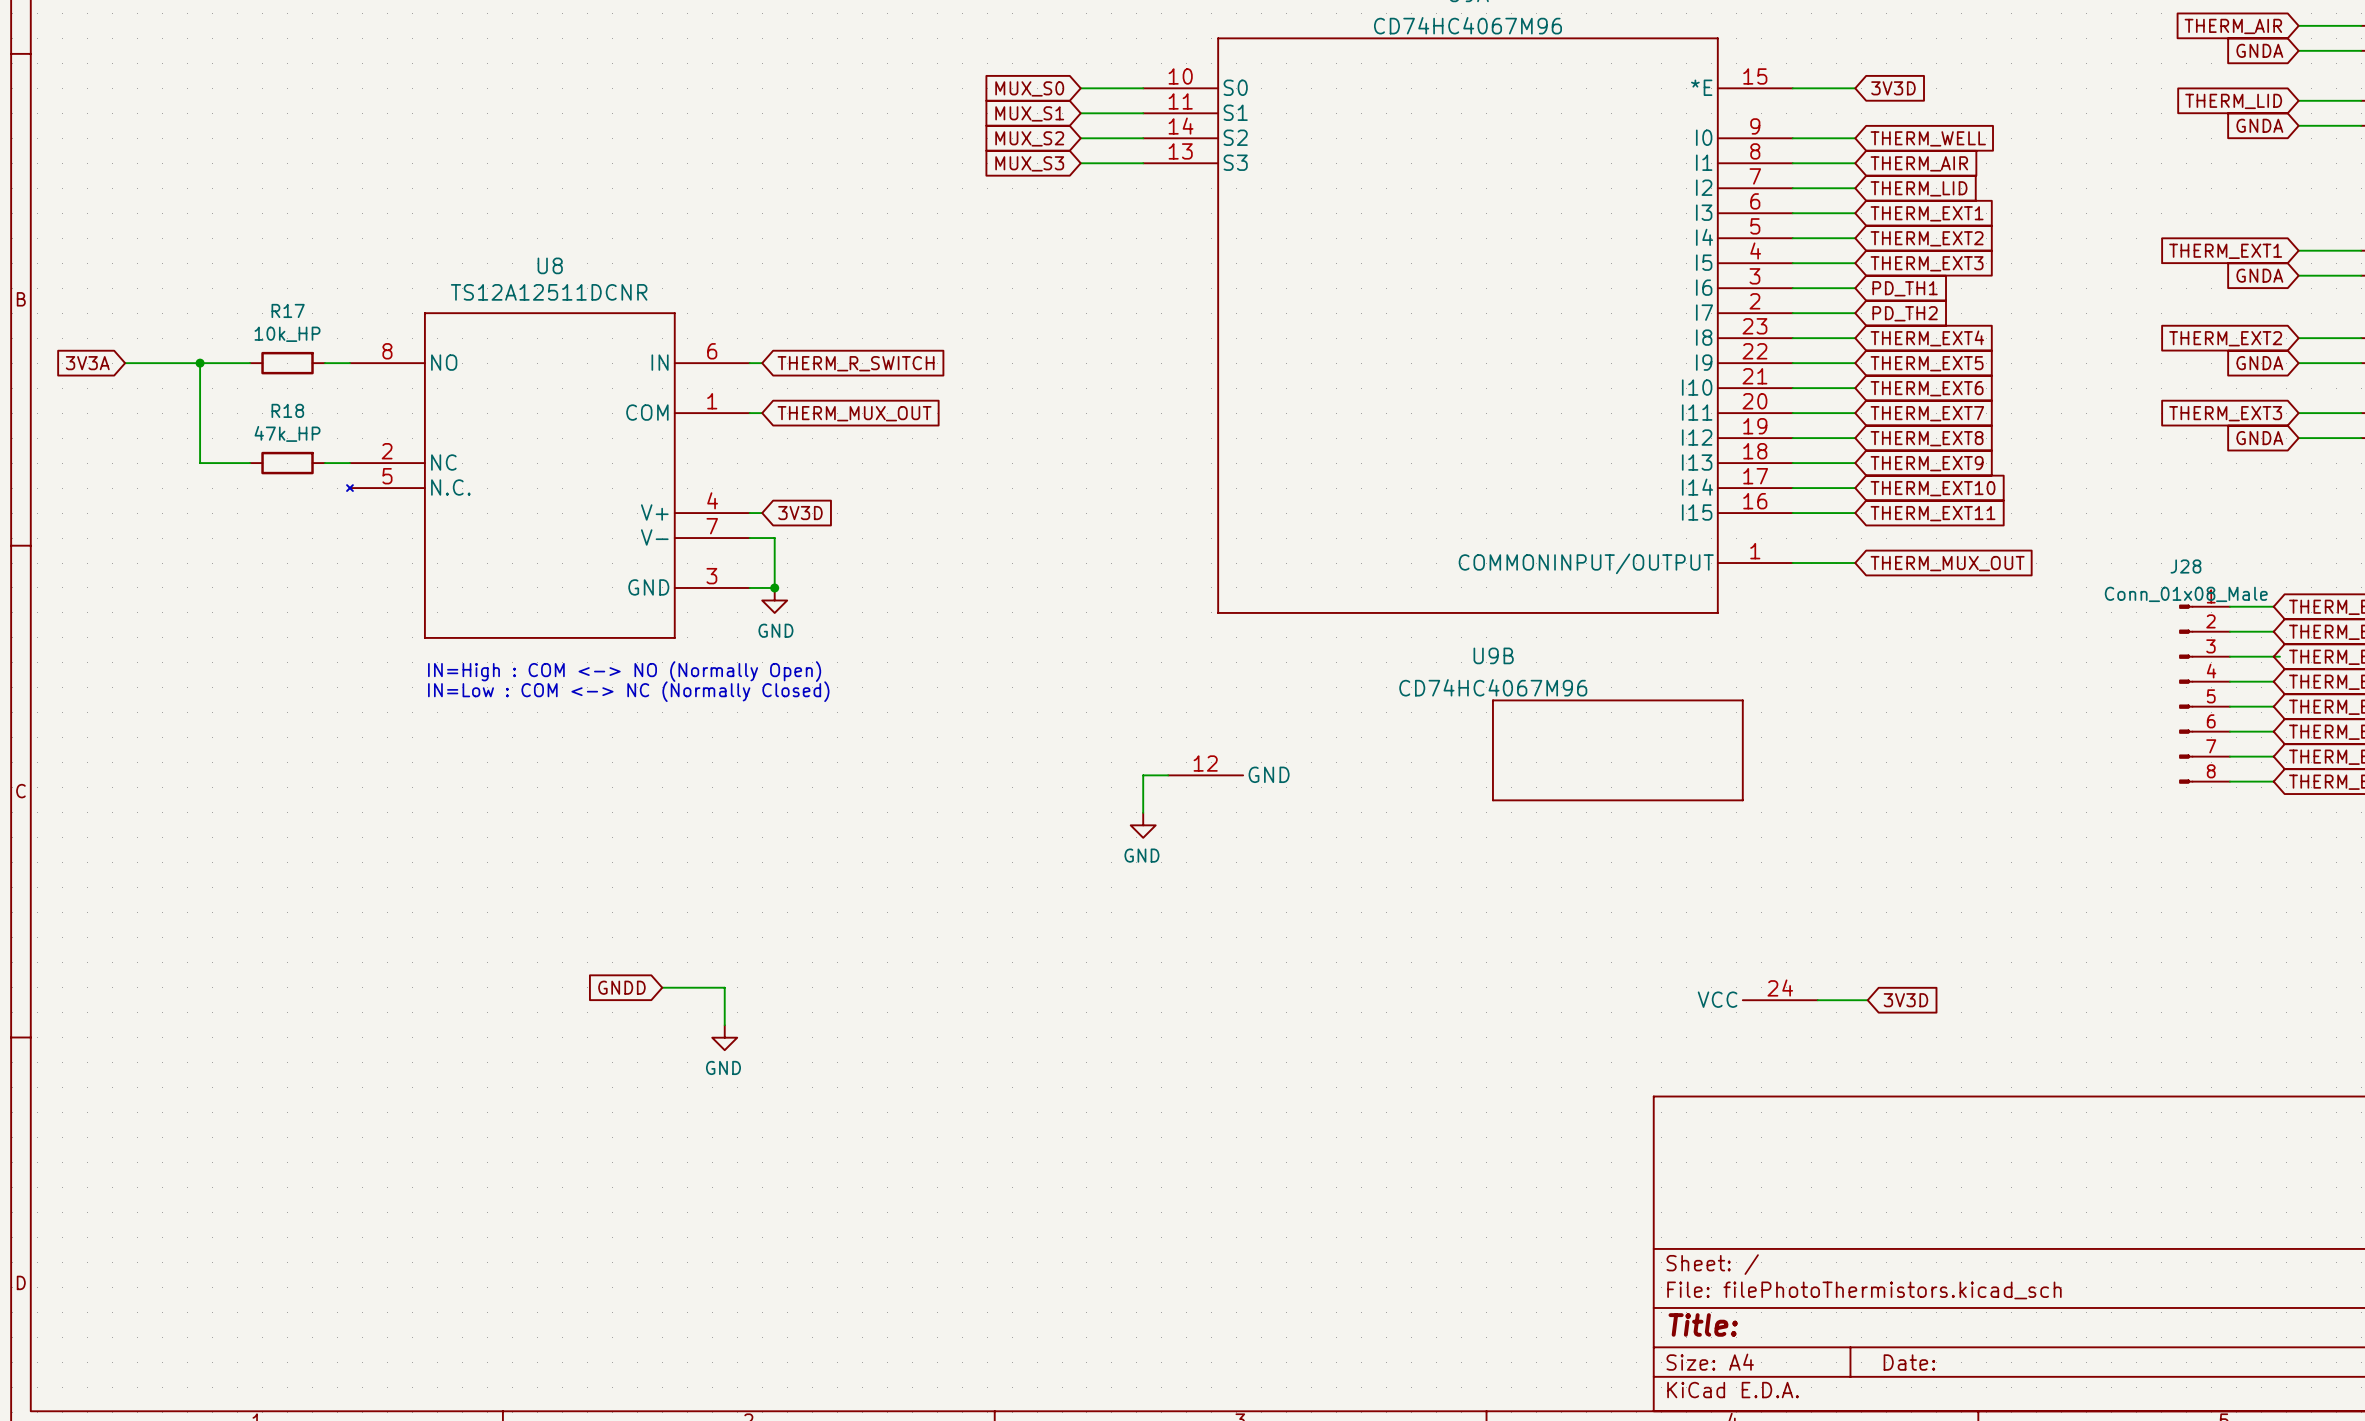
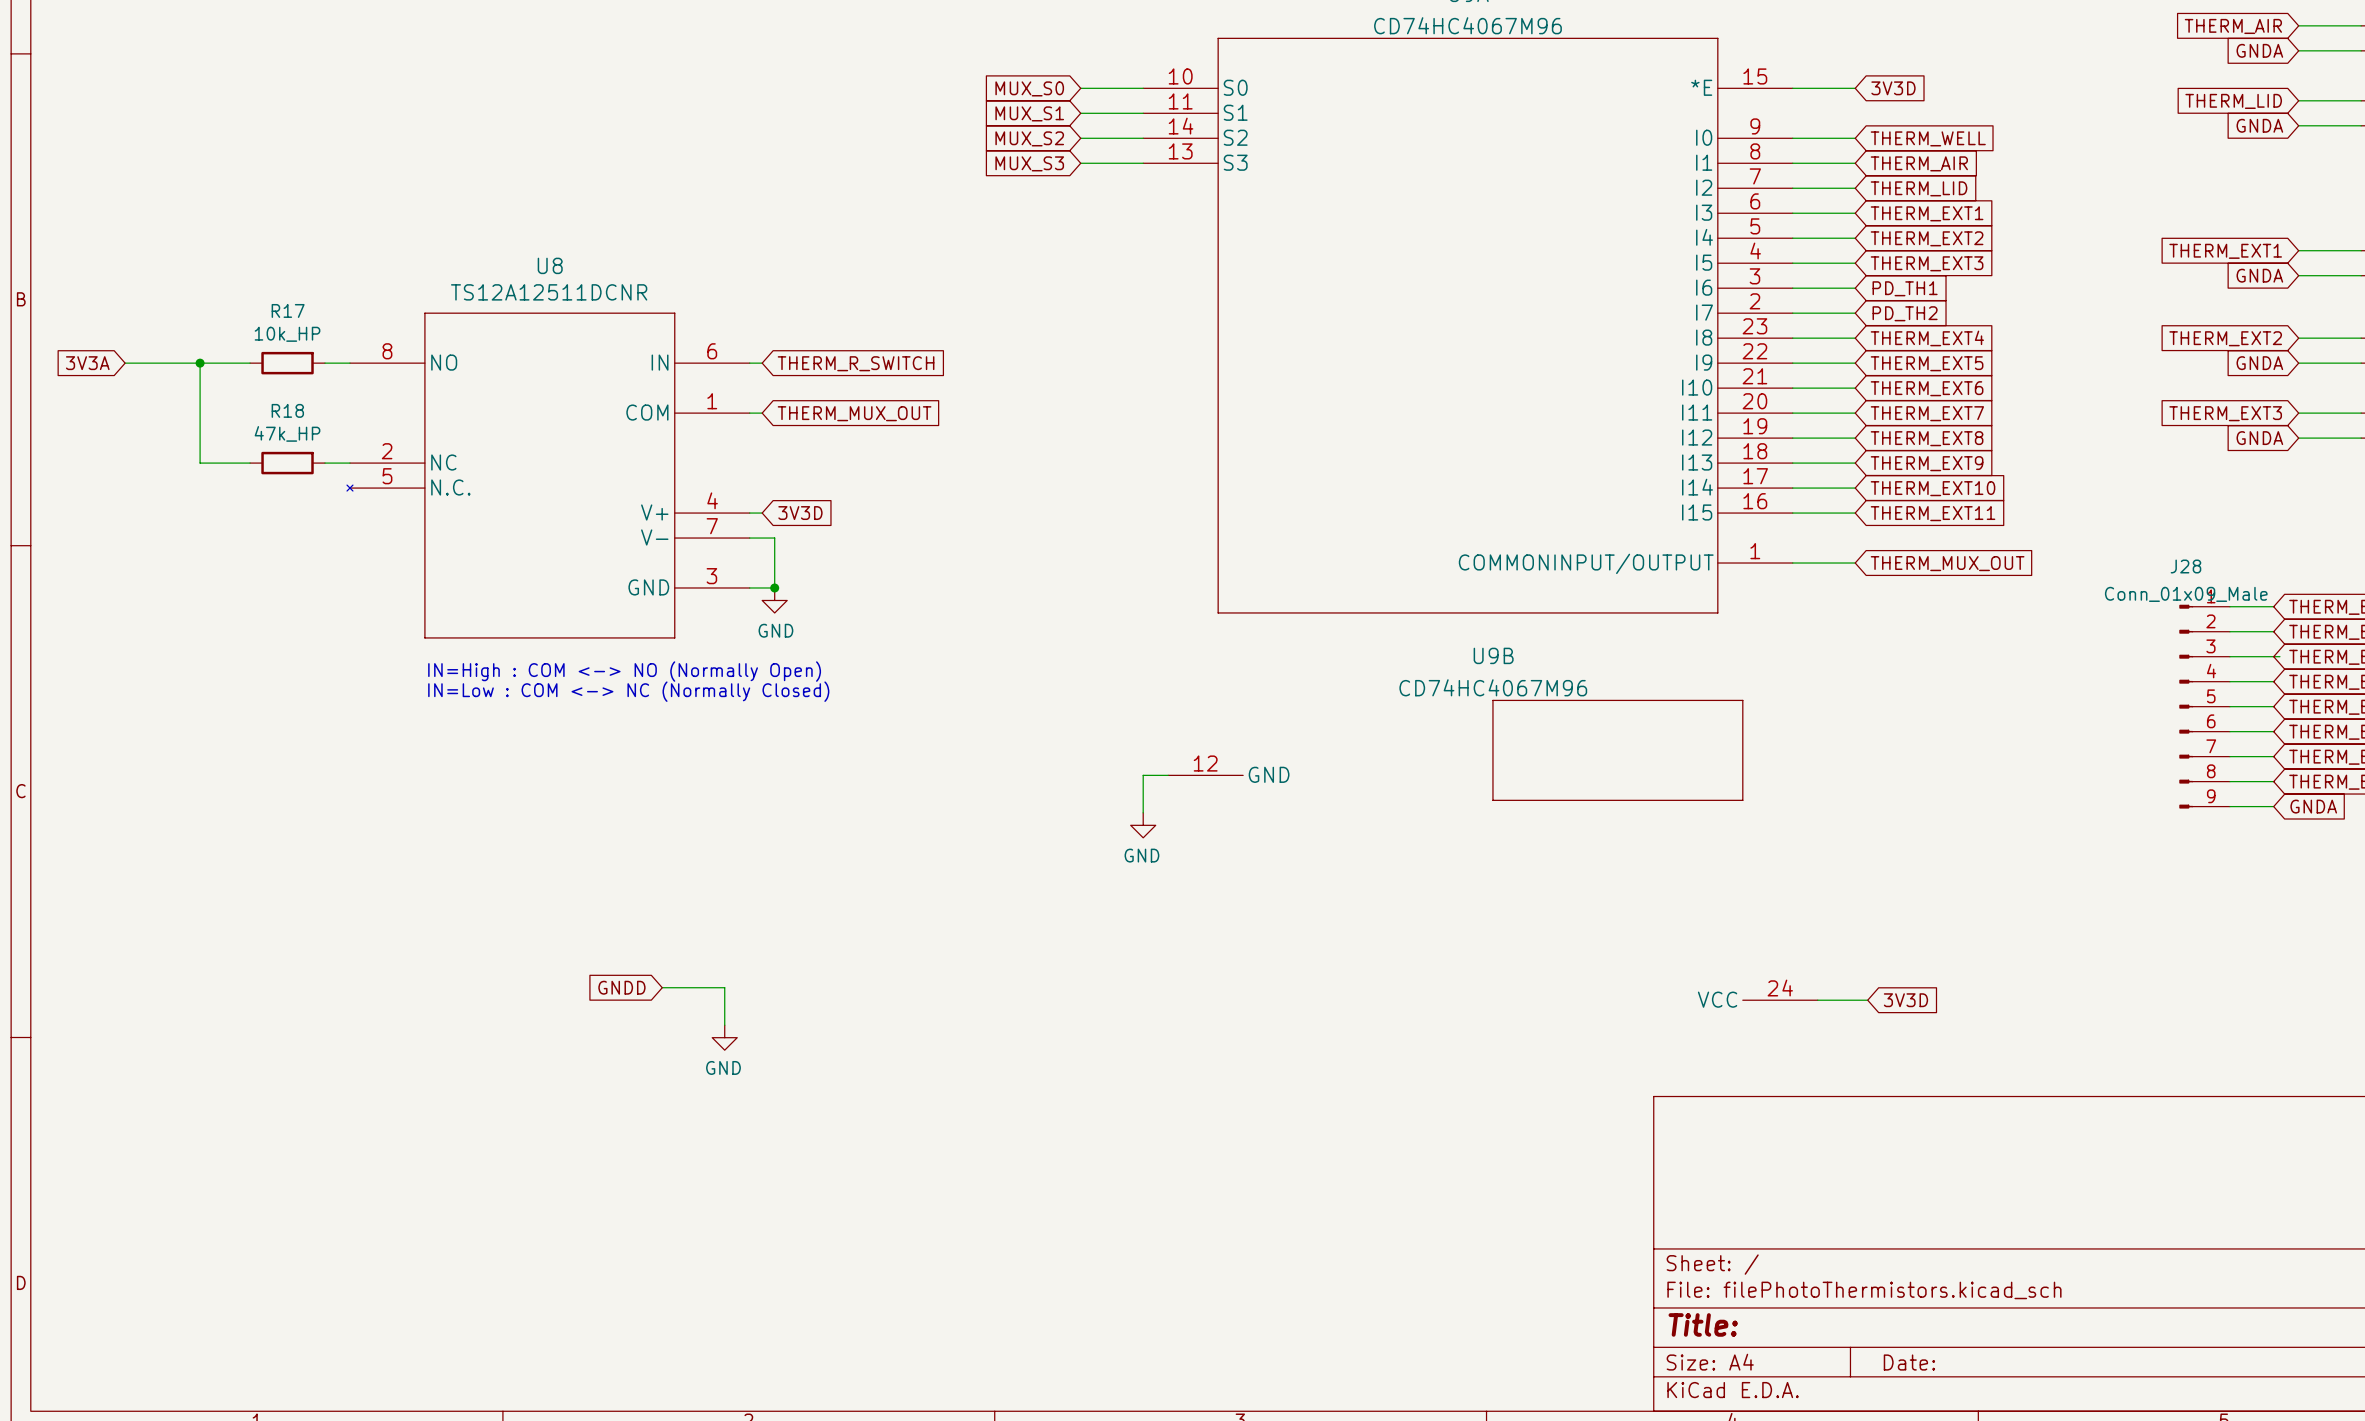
J28 value: Conn_01x08_Male (2186, 594) -> Conn_01x09_Male (2186, 594)
J28 symbol: [2179, 604, 2230, 784] -> [2179, 604, 2230, 809]
wire: none -> (2229, 806) (2273, 806)
global label: none -> GNDA (2313, 806)

